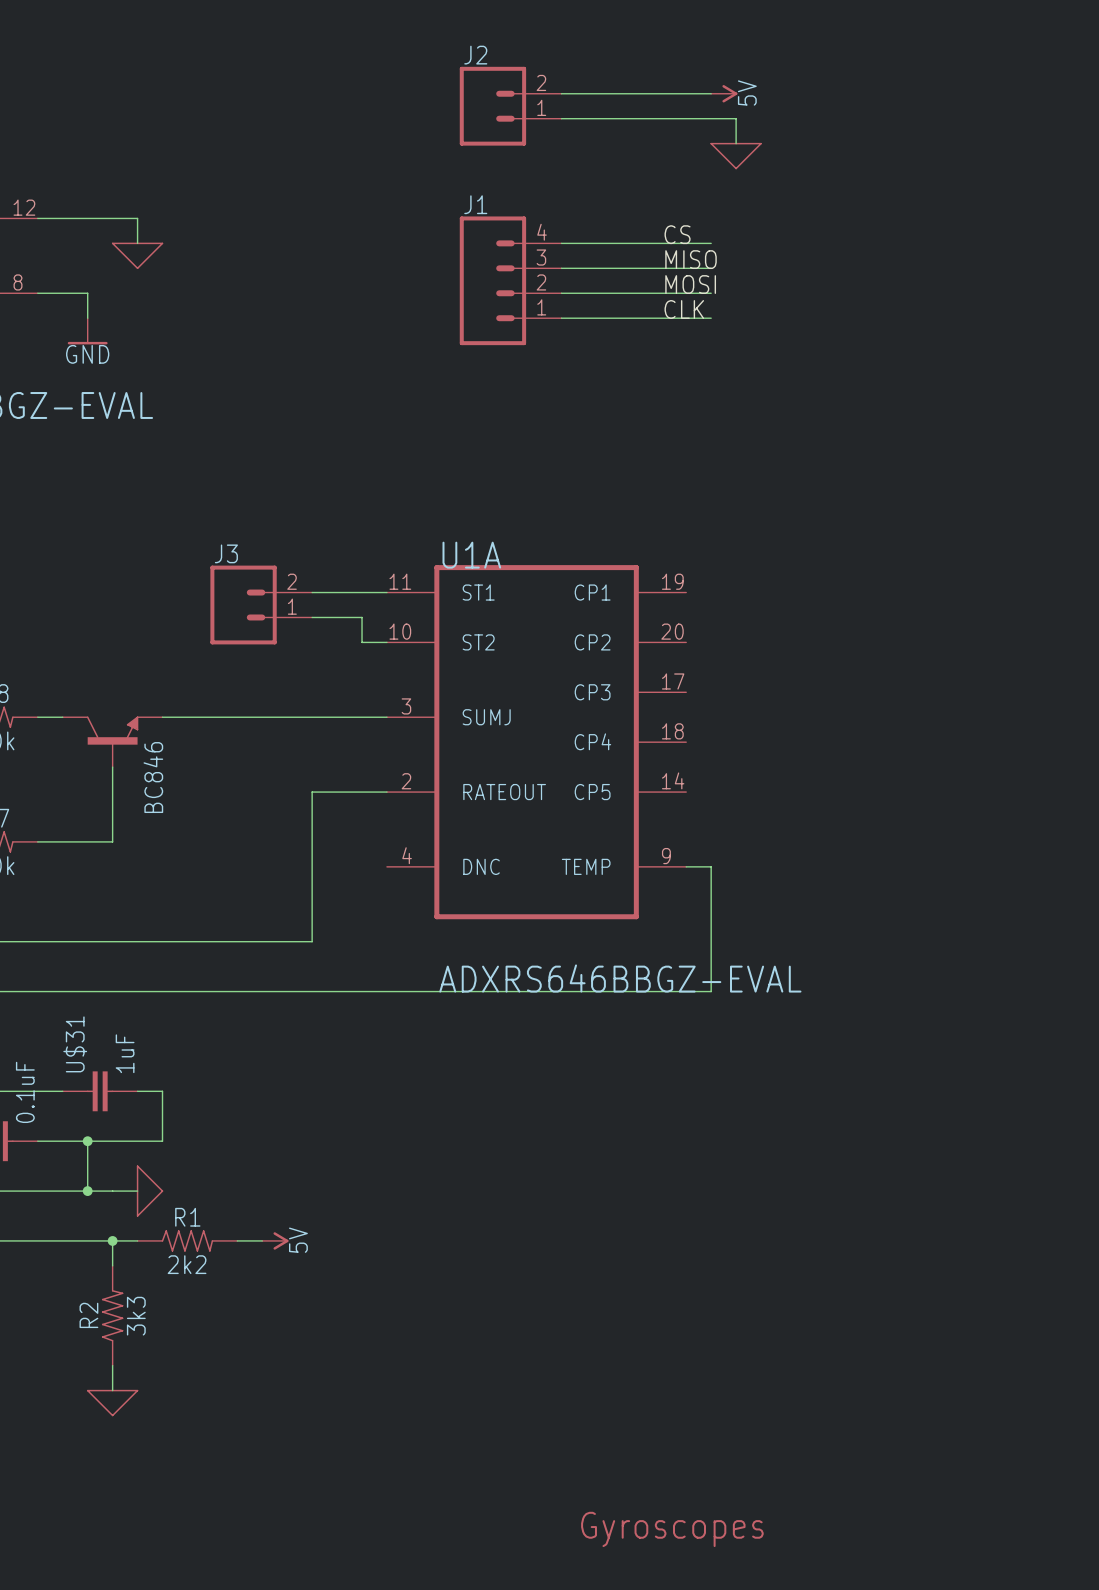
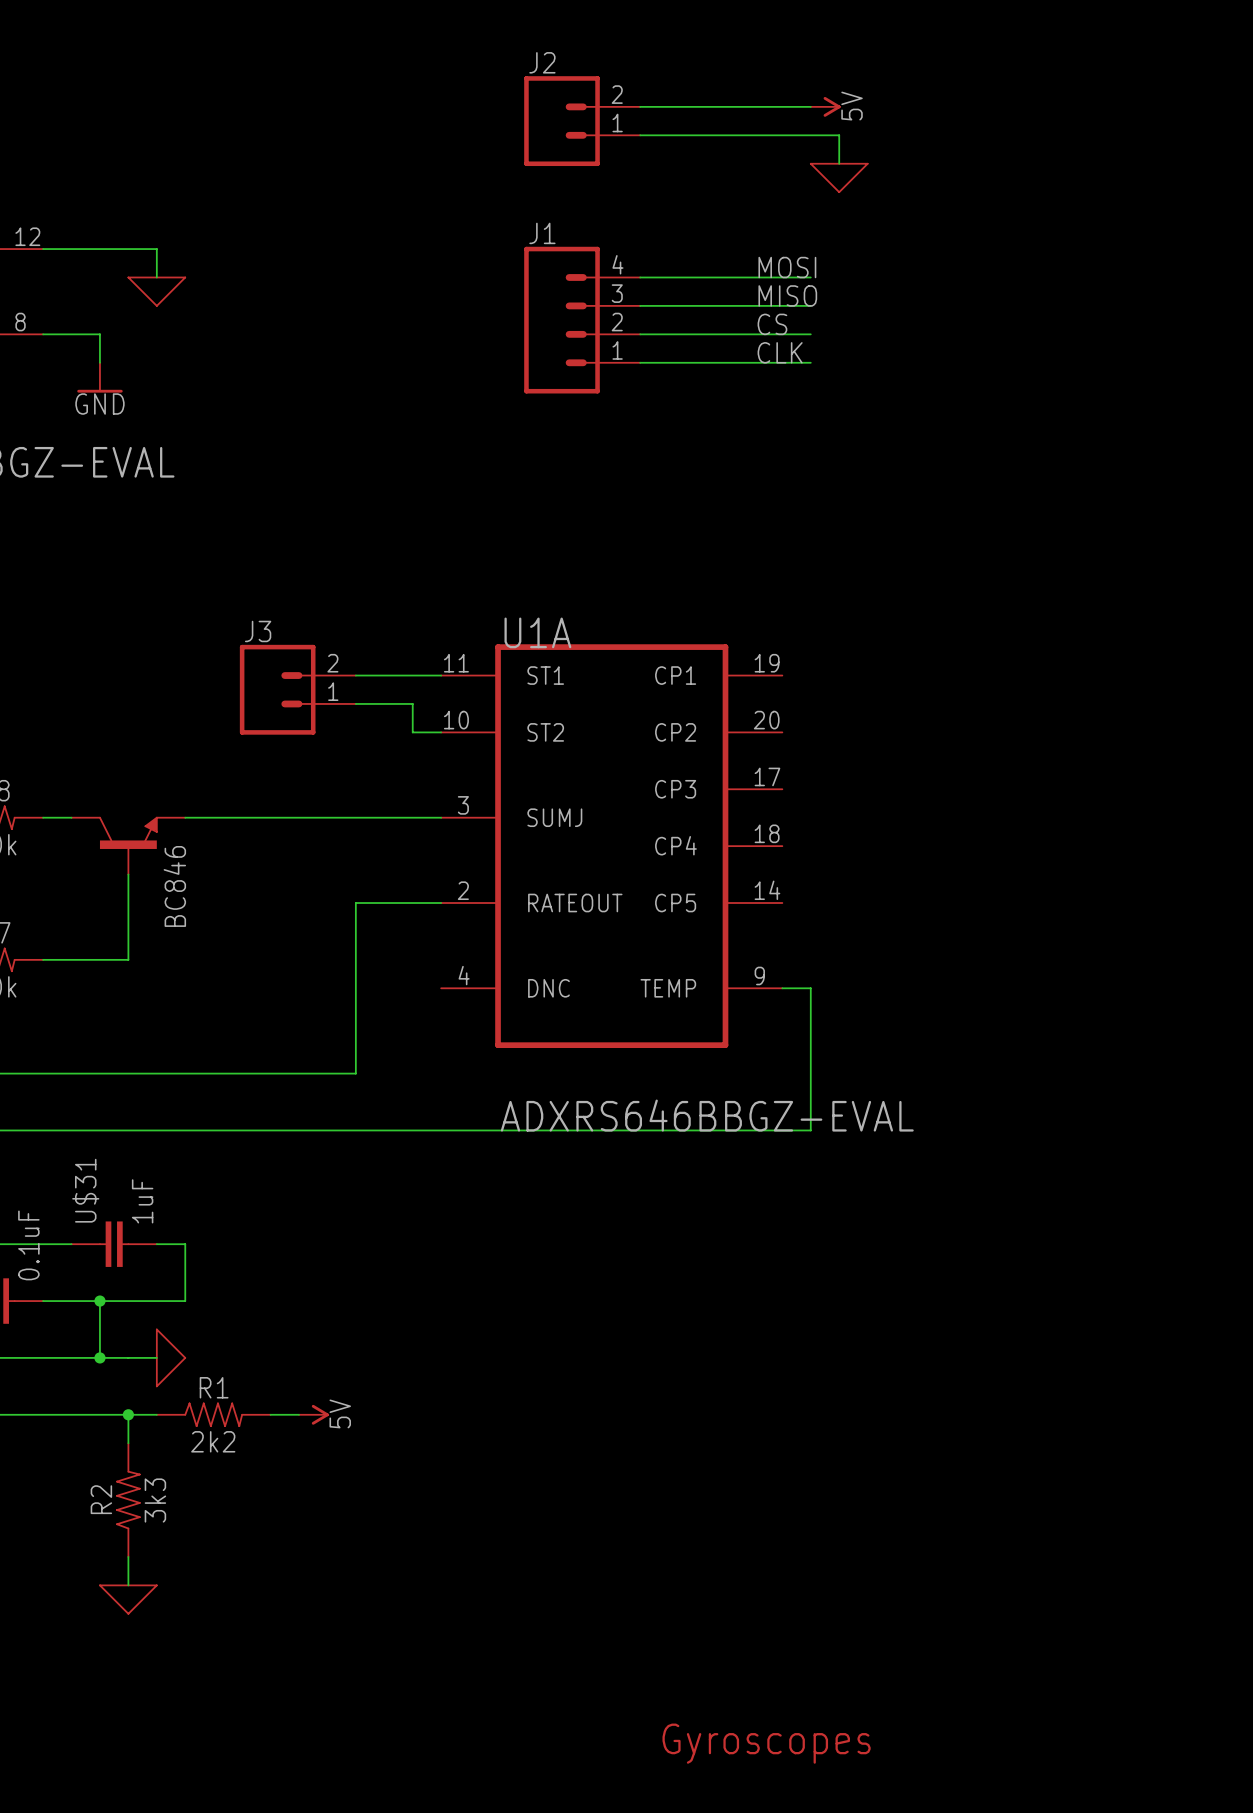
label: CS (677, 234) -> MOSI (787, 267)
label: MOSI (690, 284) -> CS (772, 324)

